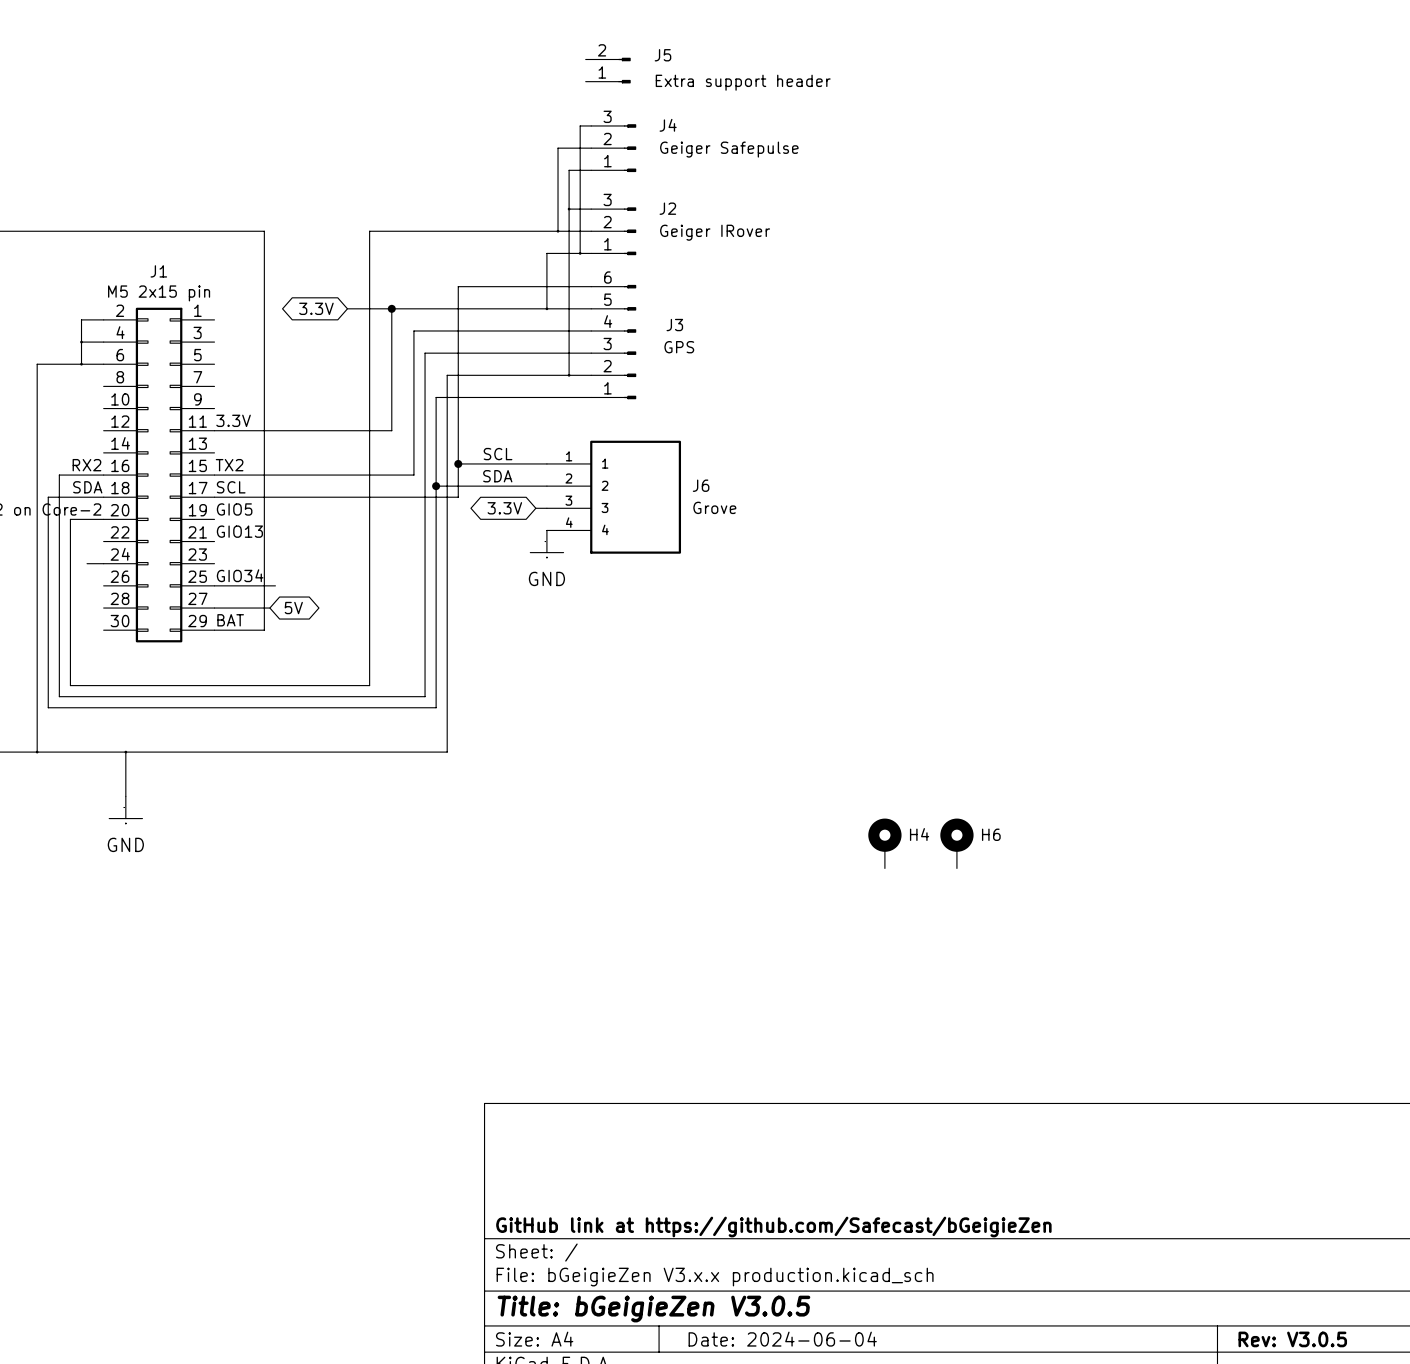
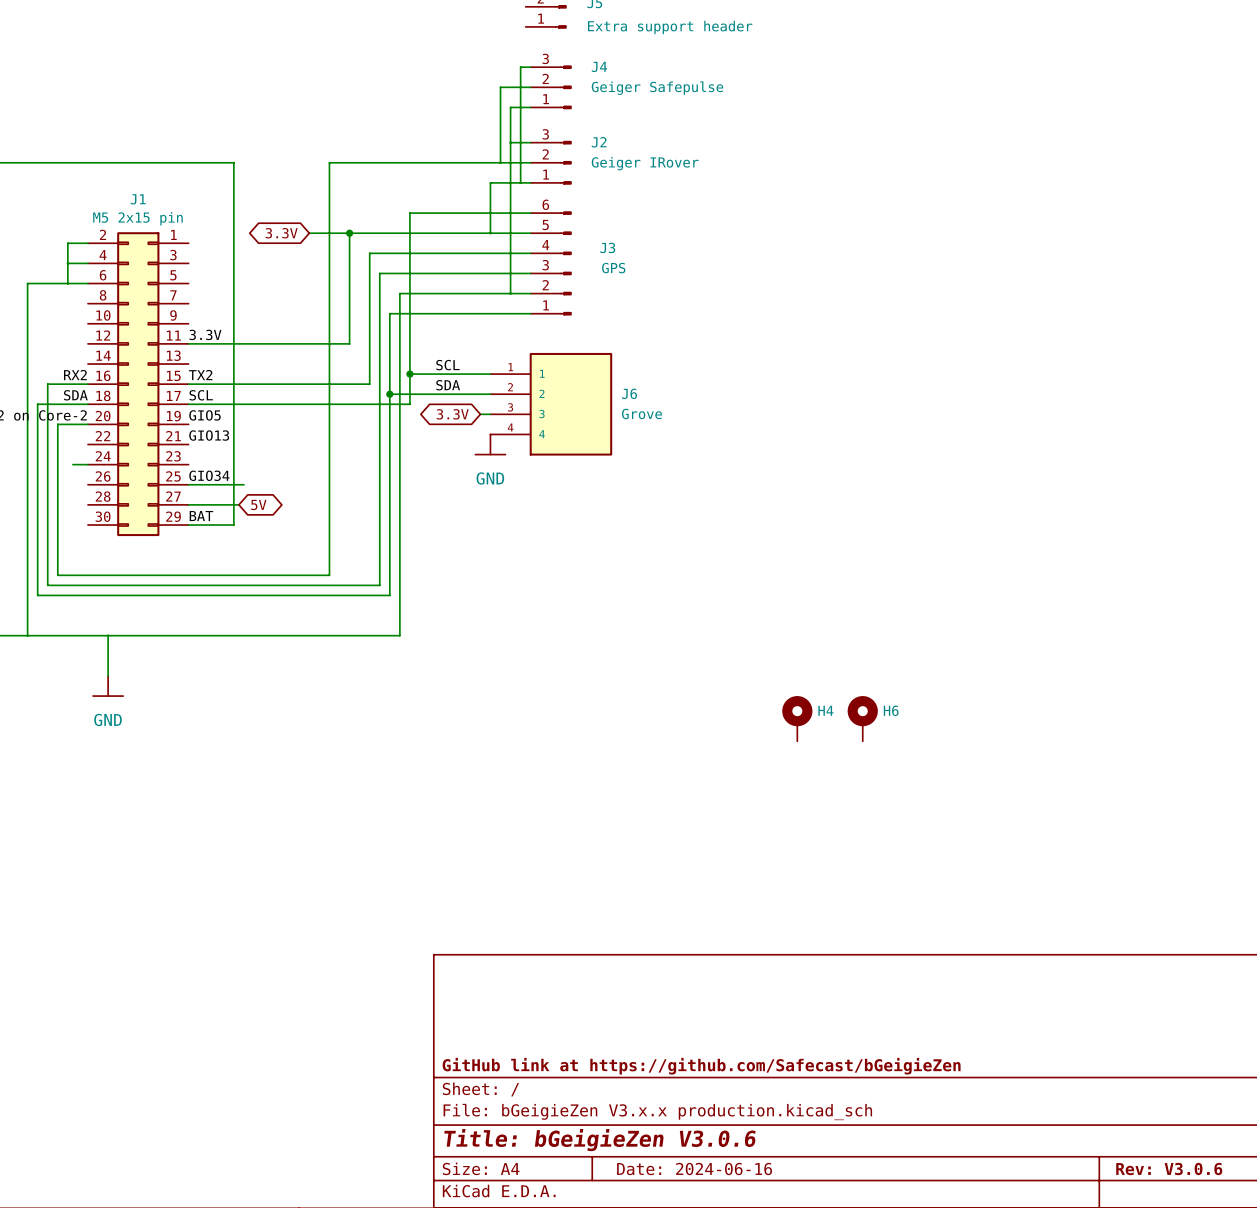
title block: Title: bGeigieZen V3.0.5 (653, 1309) -> Title: bGeigieZen V3.0.6 (599, 1140)
title block: Date: 2024-06-04 (782, 1339) -> Date: 2024-06-16 (694, 1169)
title block: Rev: V3.0.5 (1292, 1339) -> Rev: V3.0.6 (1169, 1169)

